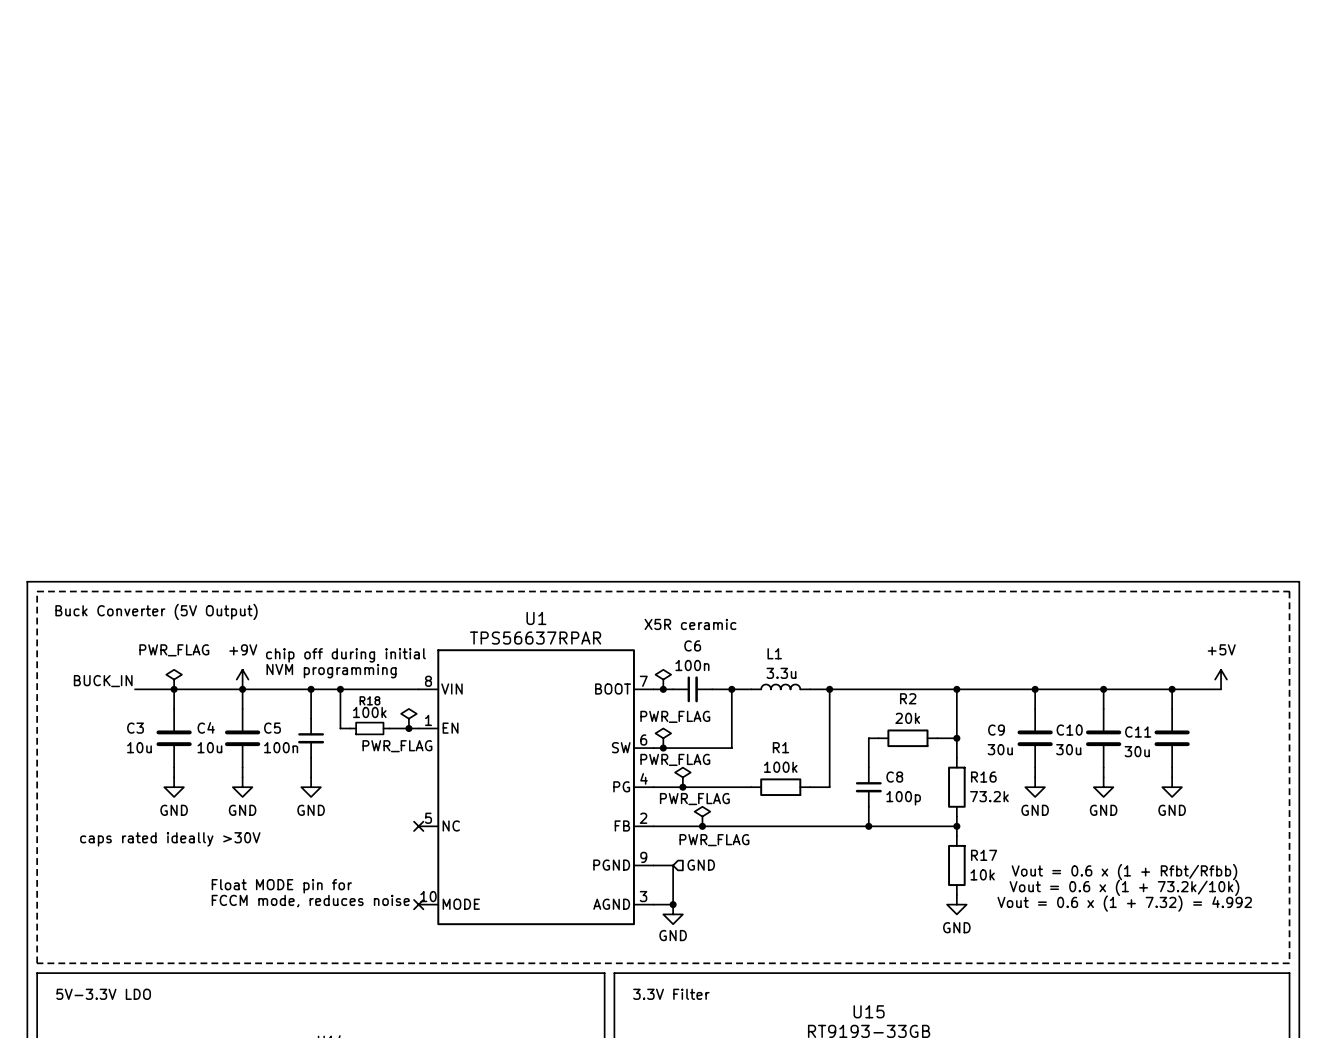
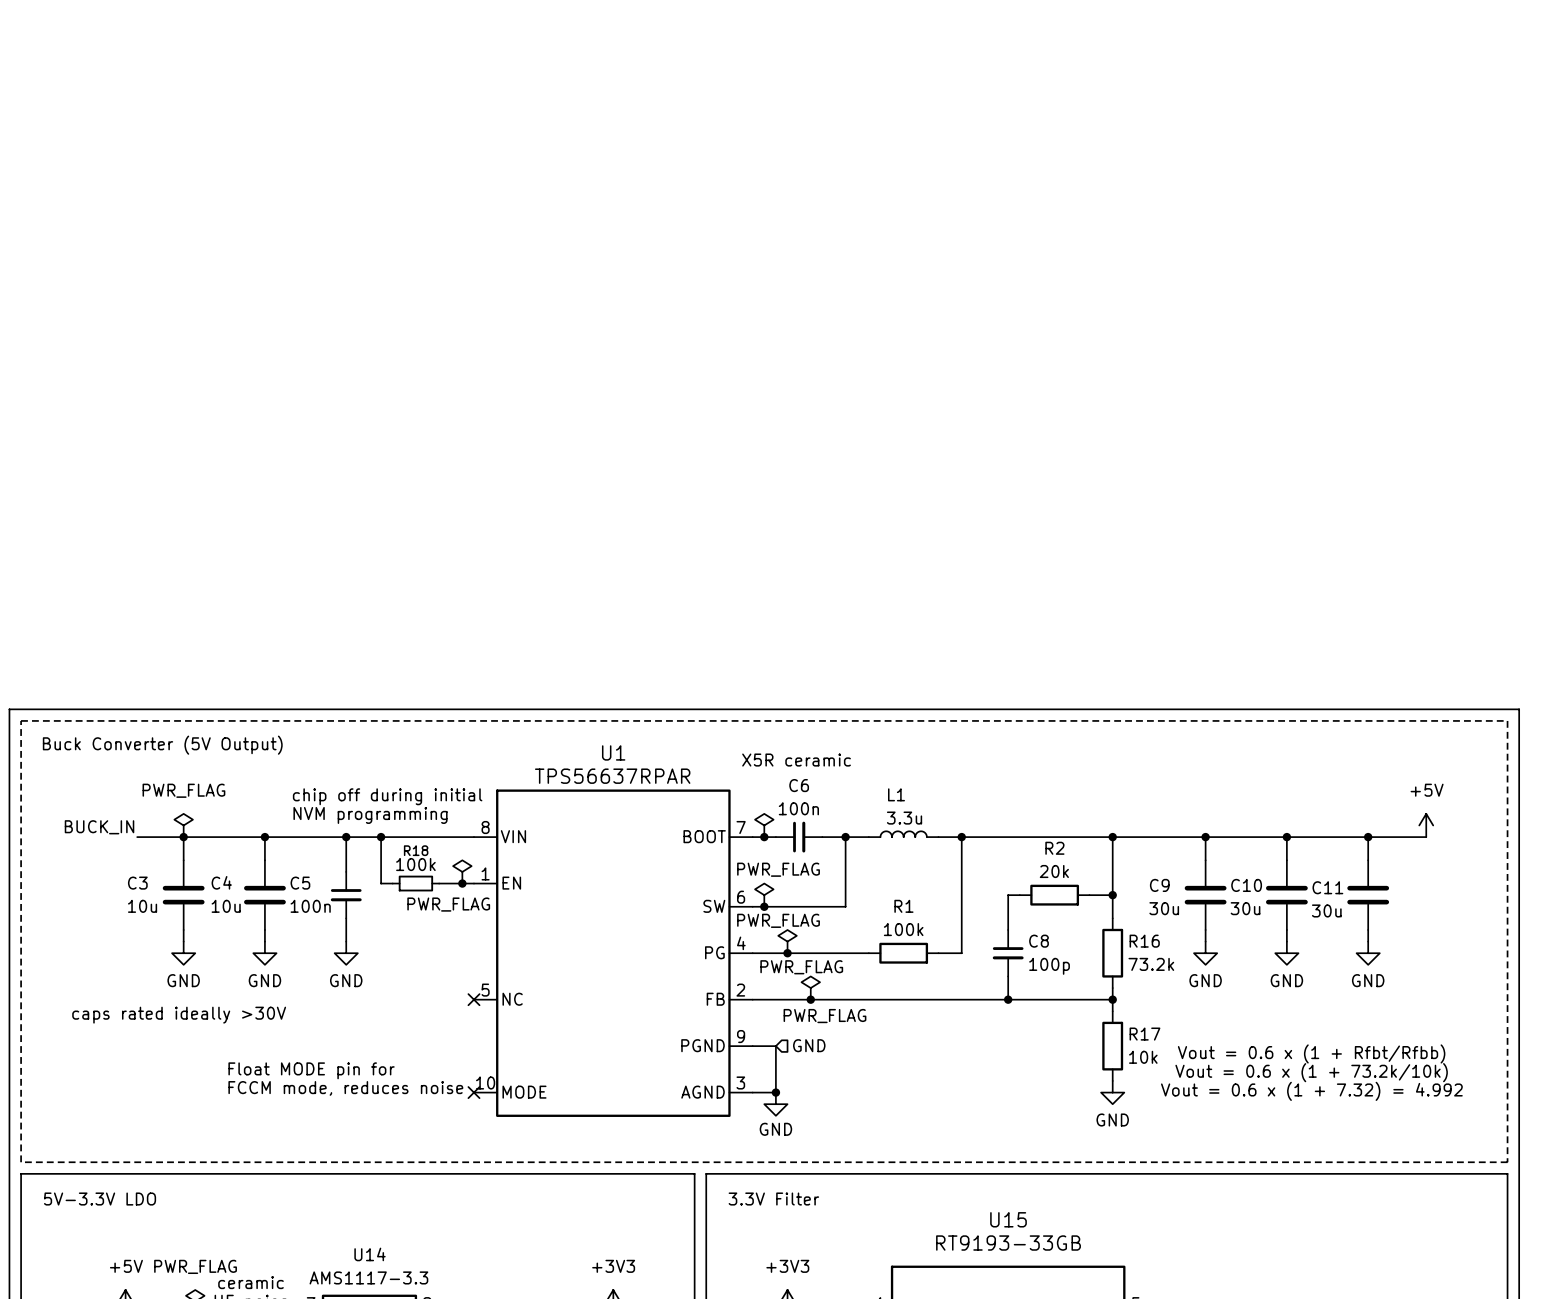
power symbol: +9V (242, 679) -> none

